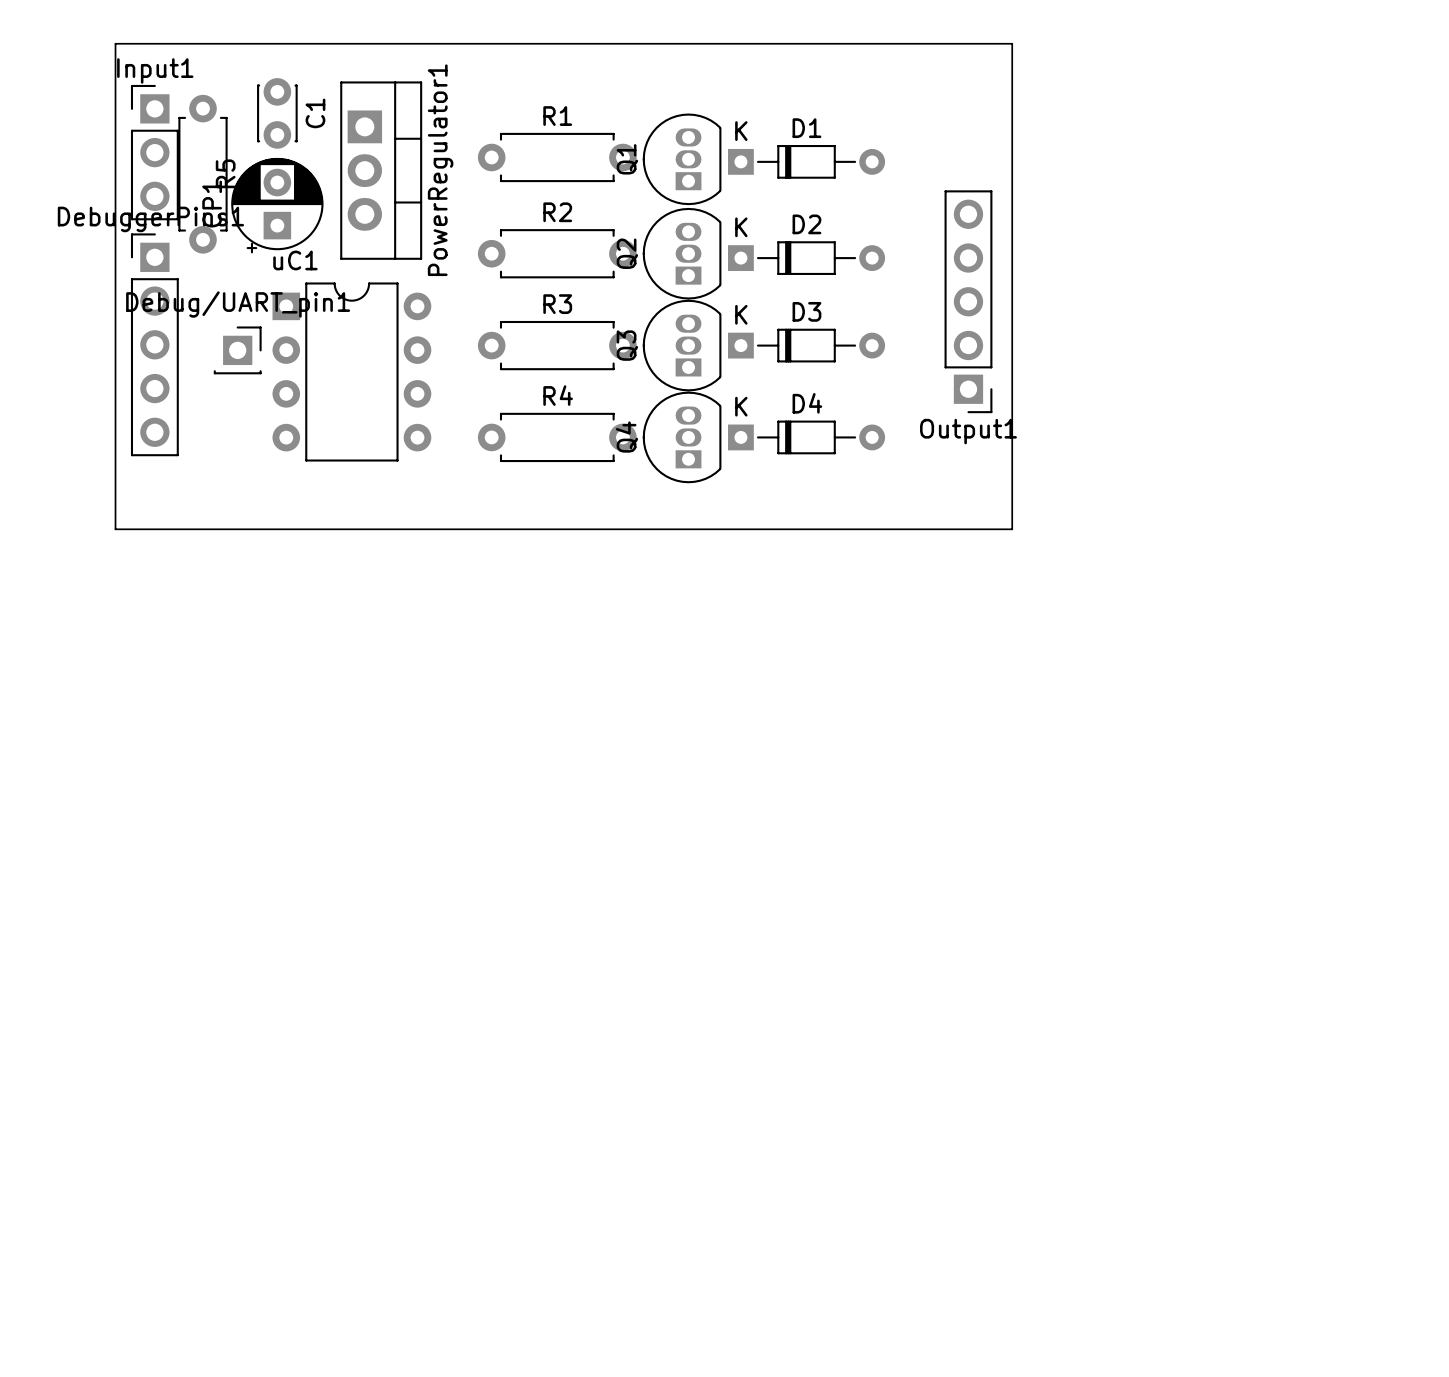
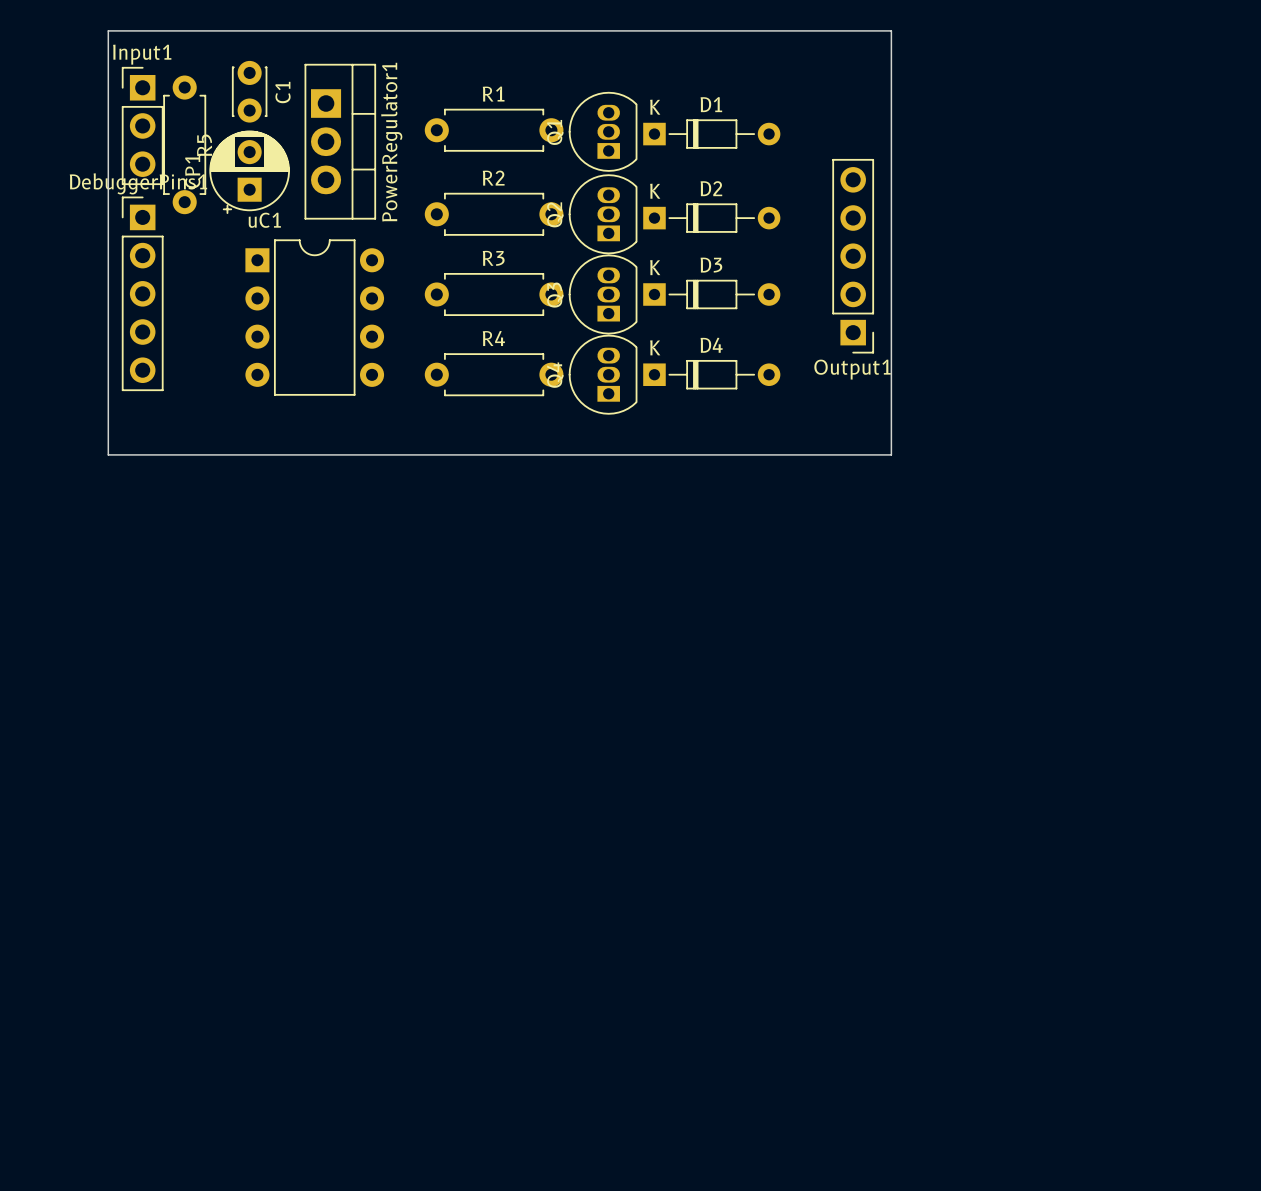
Debug/UART_pin1: (237, 350) -> none

